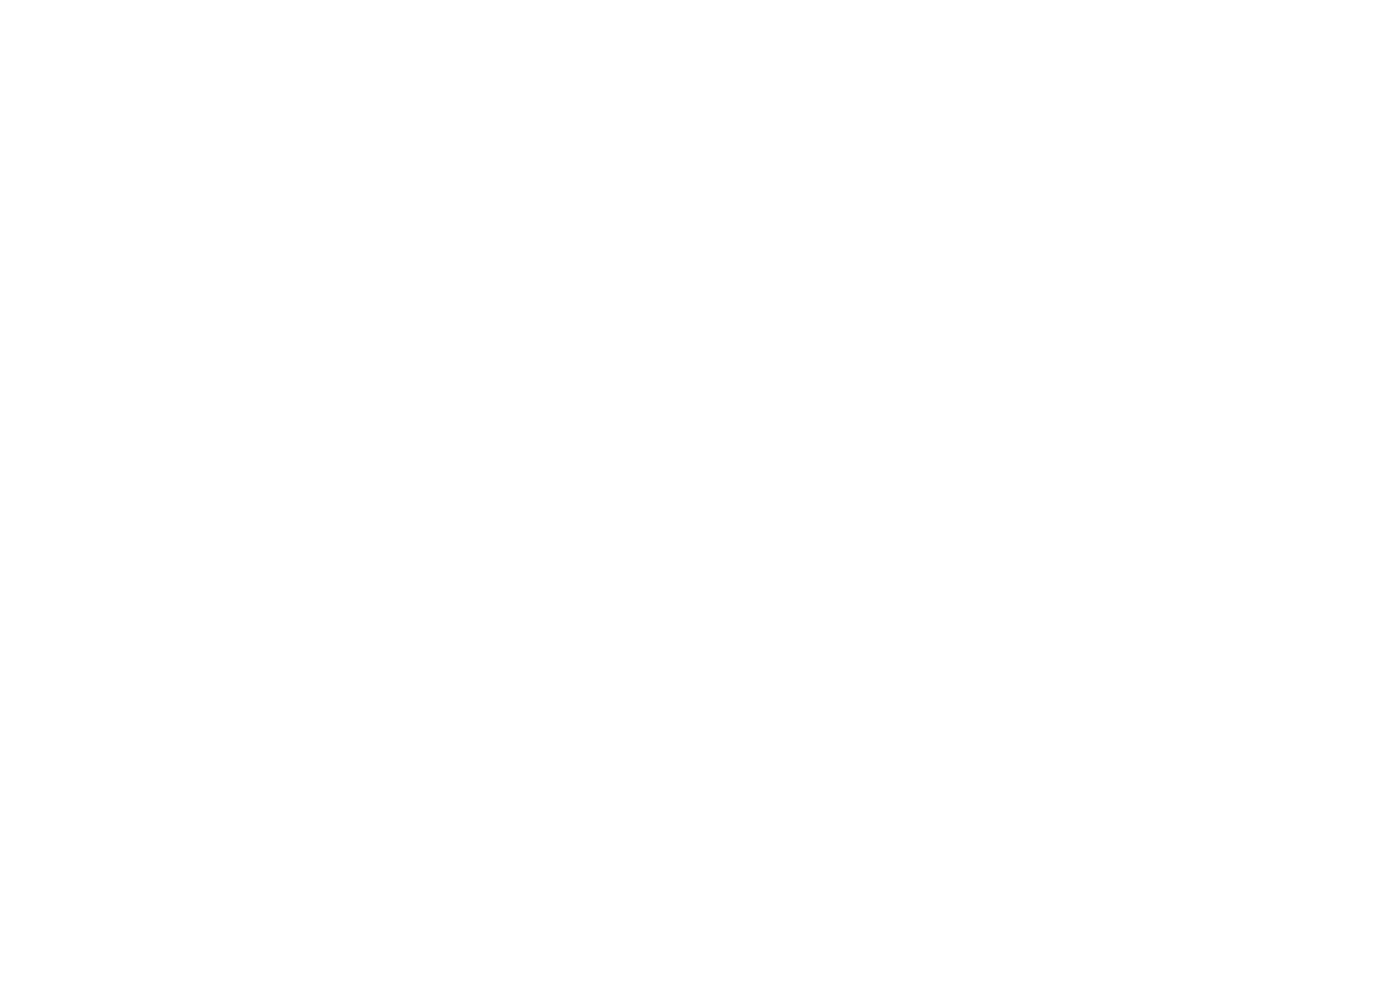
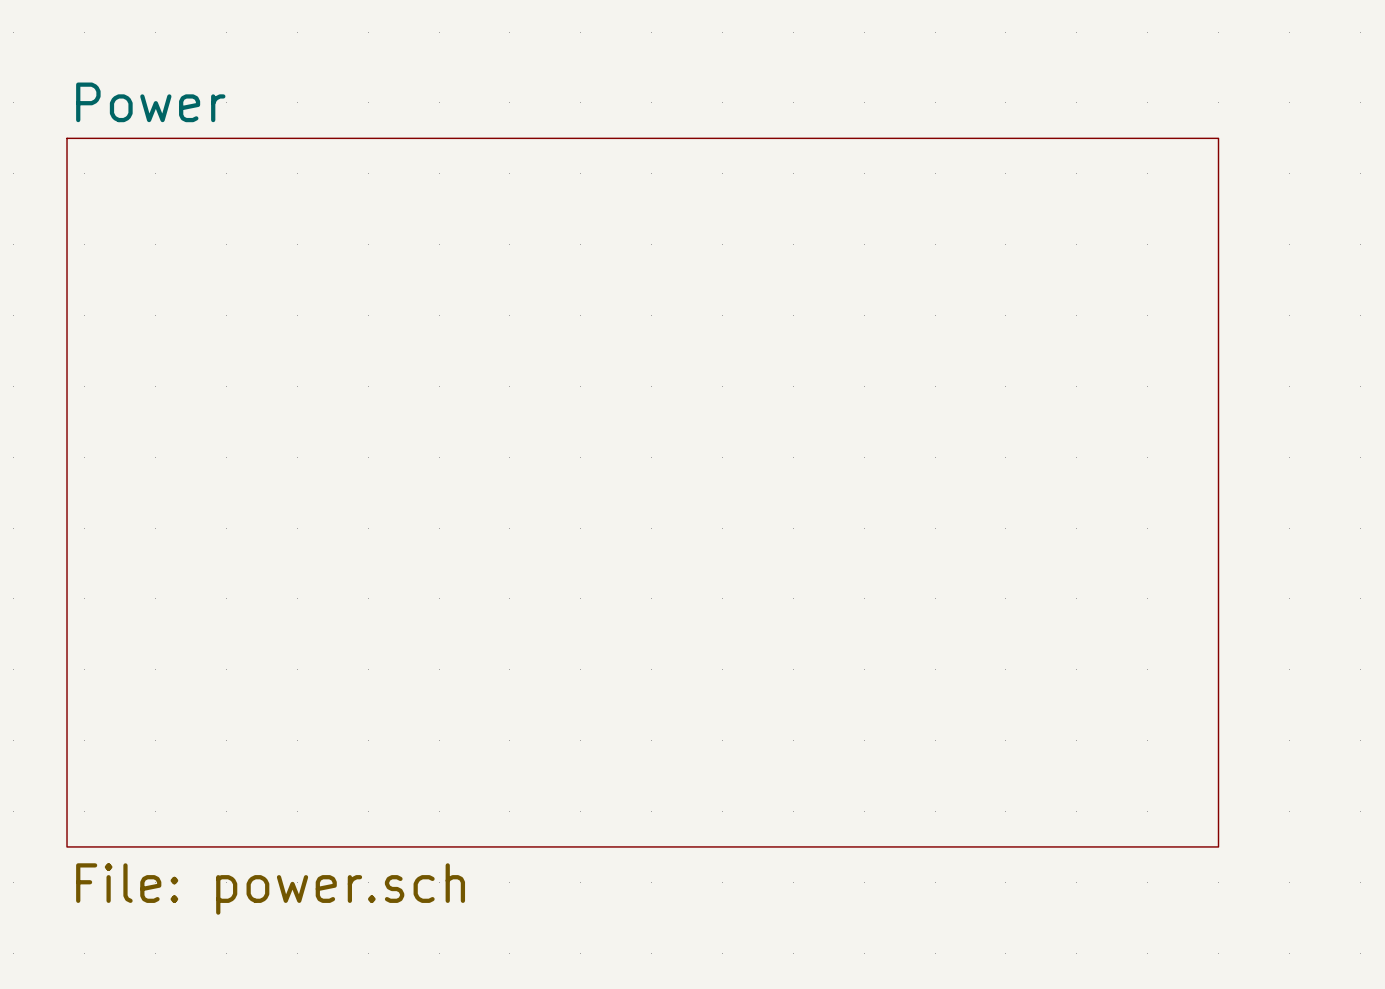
sheet Power: none -> File: power.sch (642, 492)

